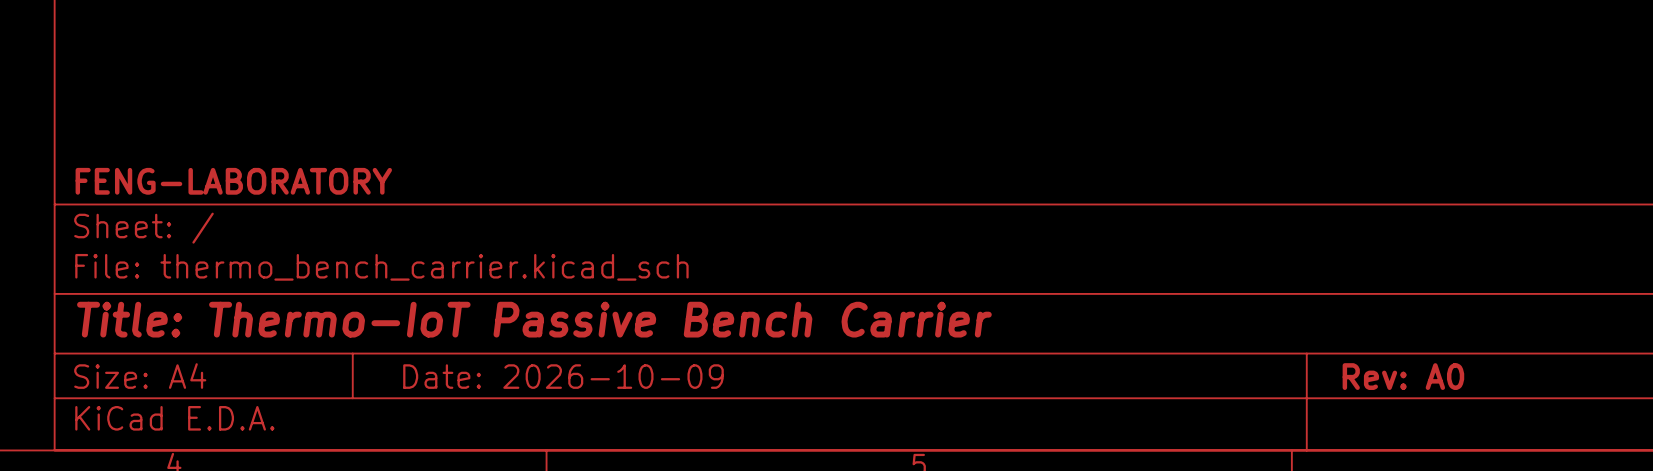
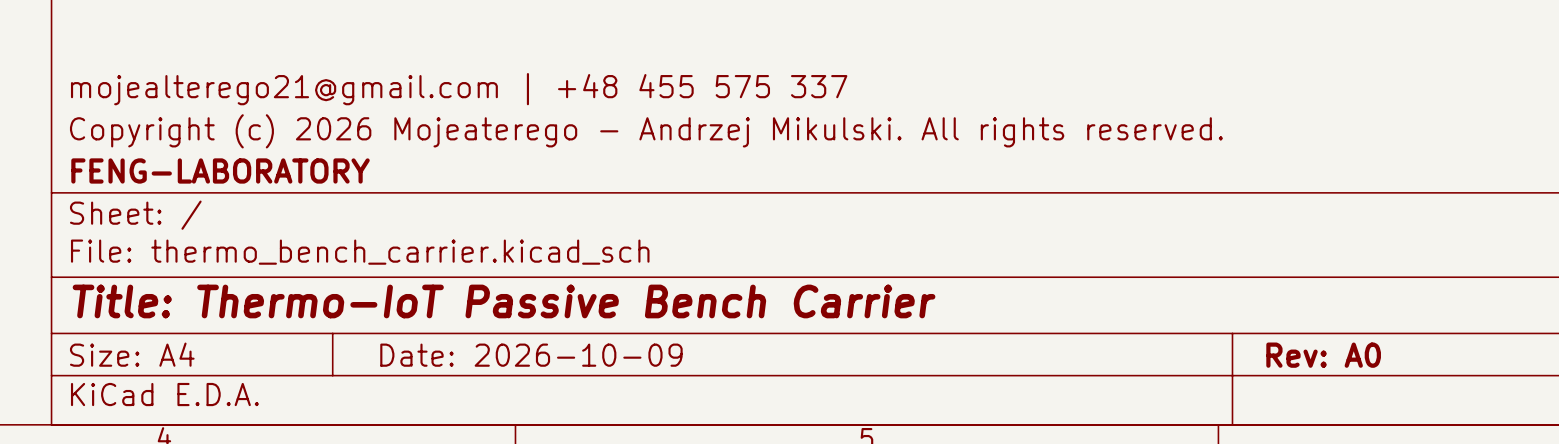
title block: none -> mojealterego21@gmail.com | +48 455 575 337 (459, 89)
title block: none -> Copyright (c) 2026 Mojeaterego - Andrzej Mikulski. All rights reserved. (646, 131)

